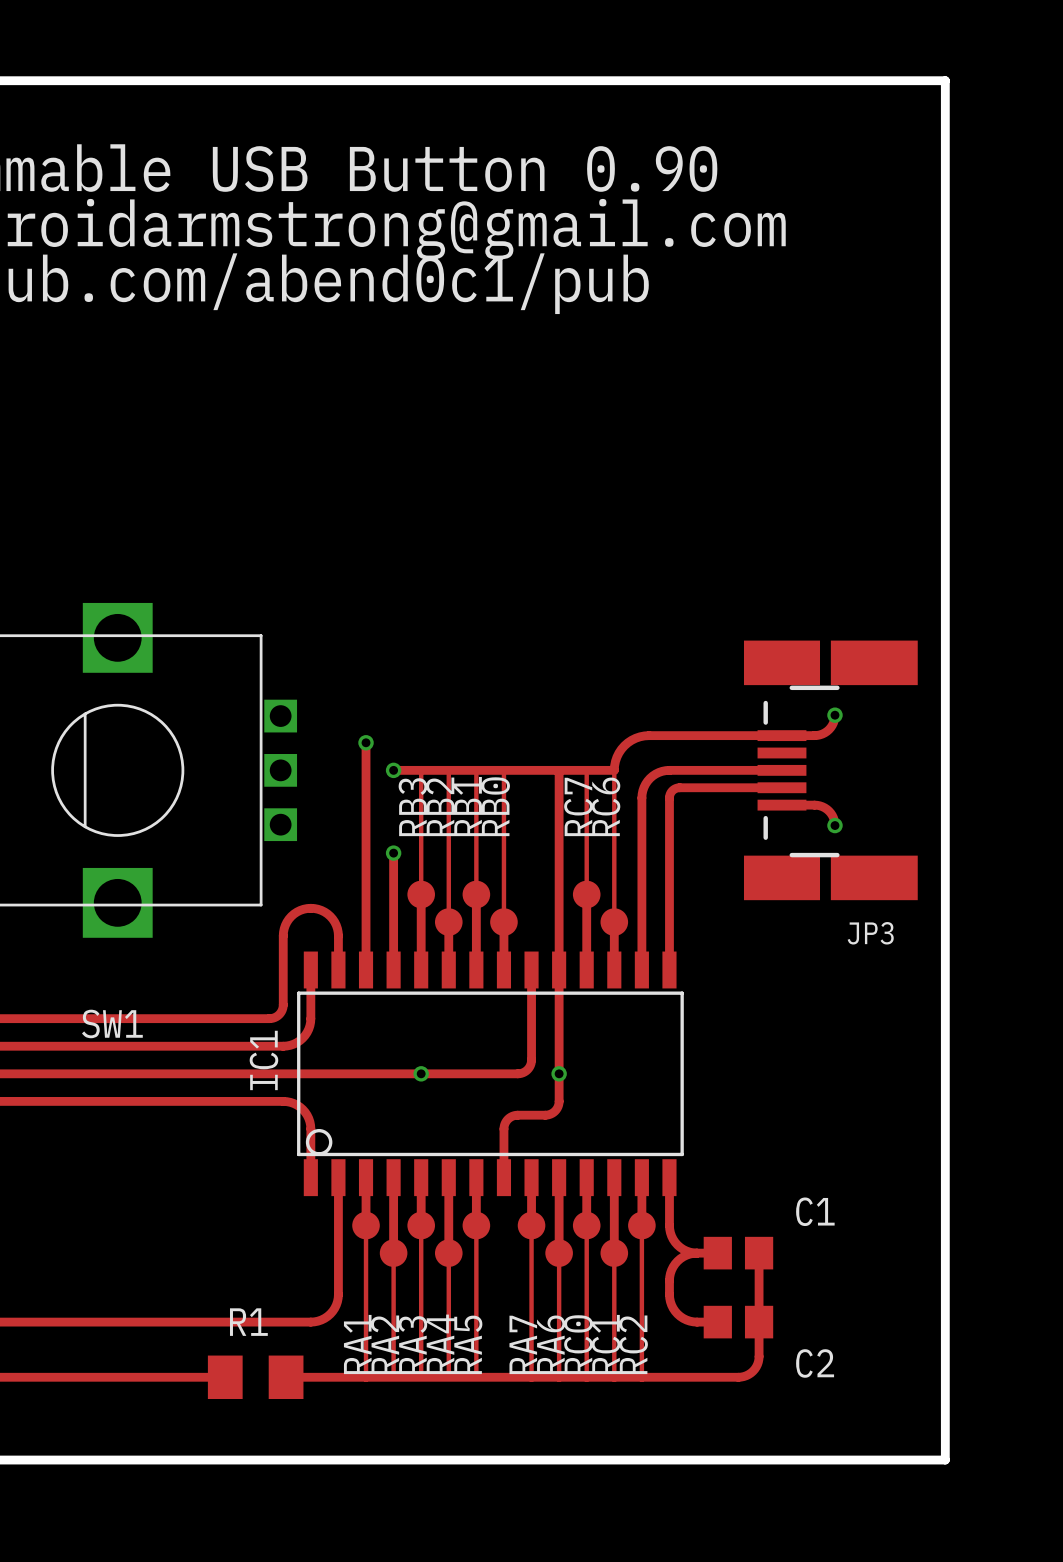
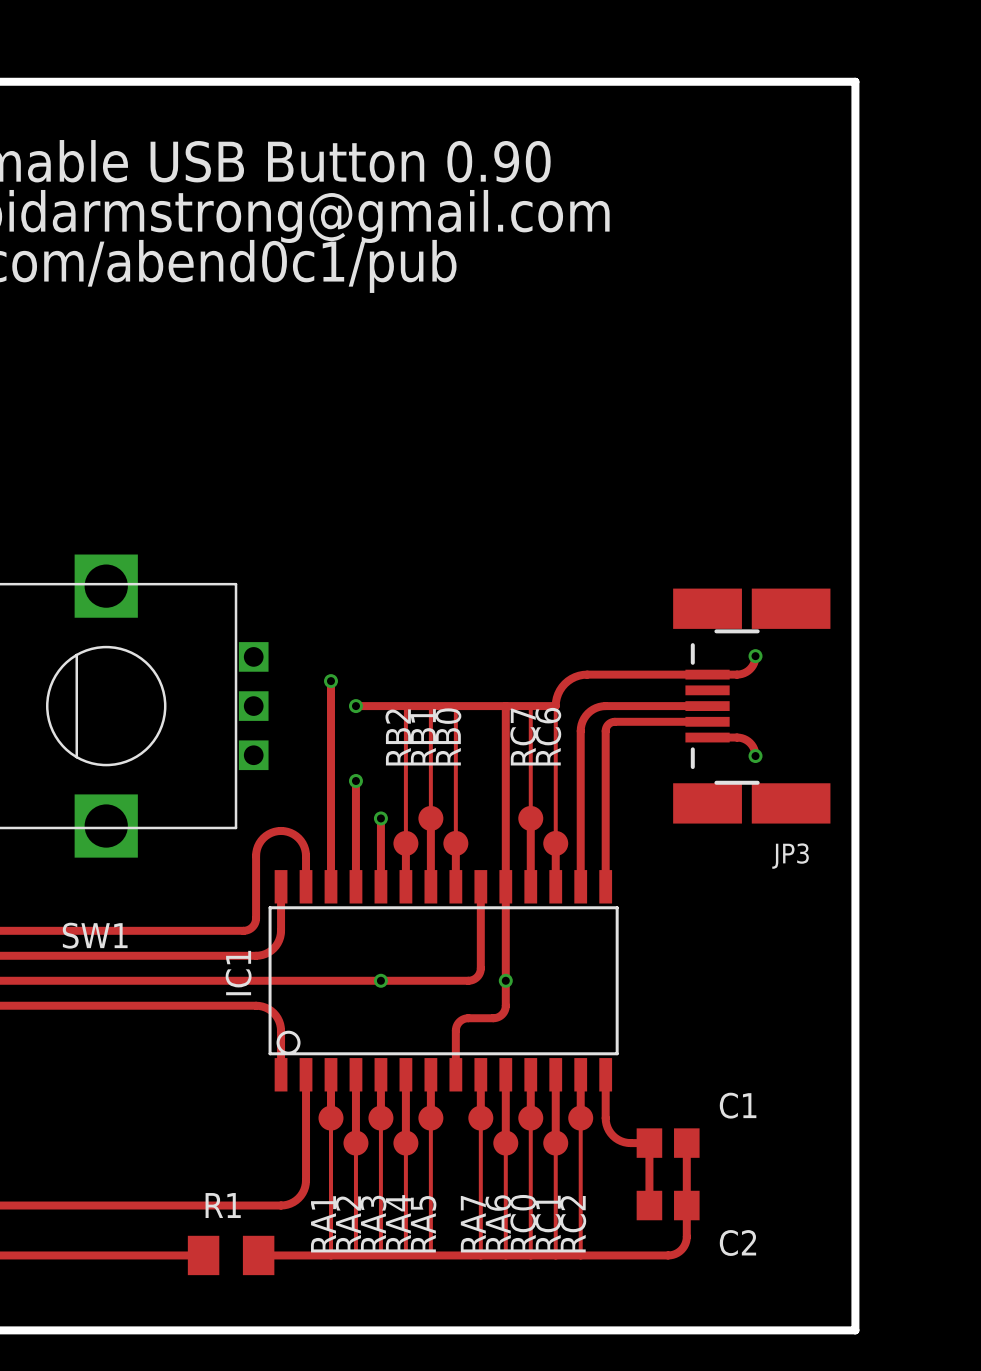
track: (421, 770) (421, 969) -> none
RB3: (421, 894) -> none
via: none -> (380, 818)
track: (697, 1253) (683, 1256) (673, 1266) (669, 1277) (670, 1301) (675, 1311) (686, 1320) (717, 1322) -> (649, 1143) (649, 1205)

